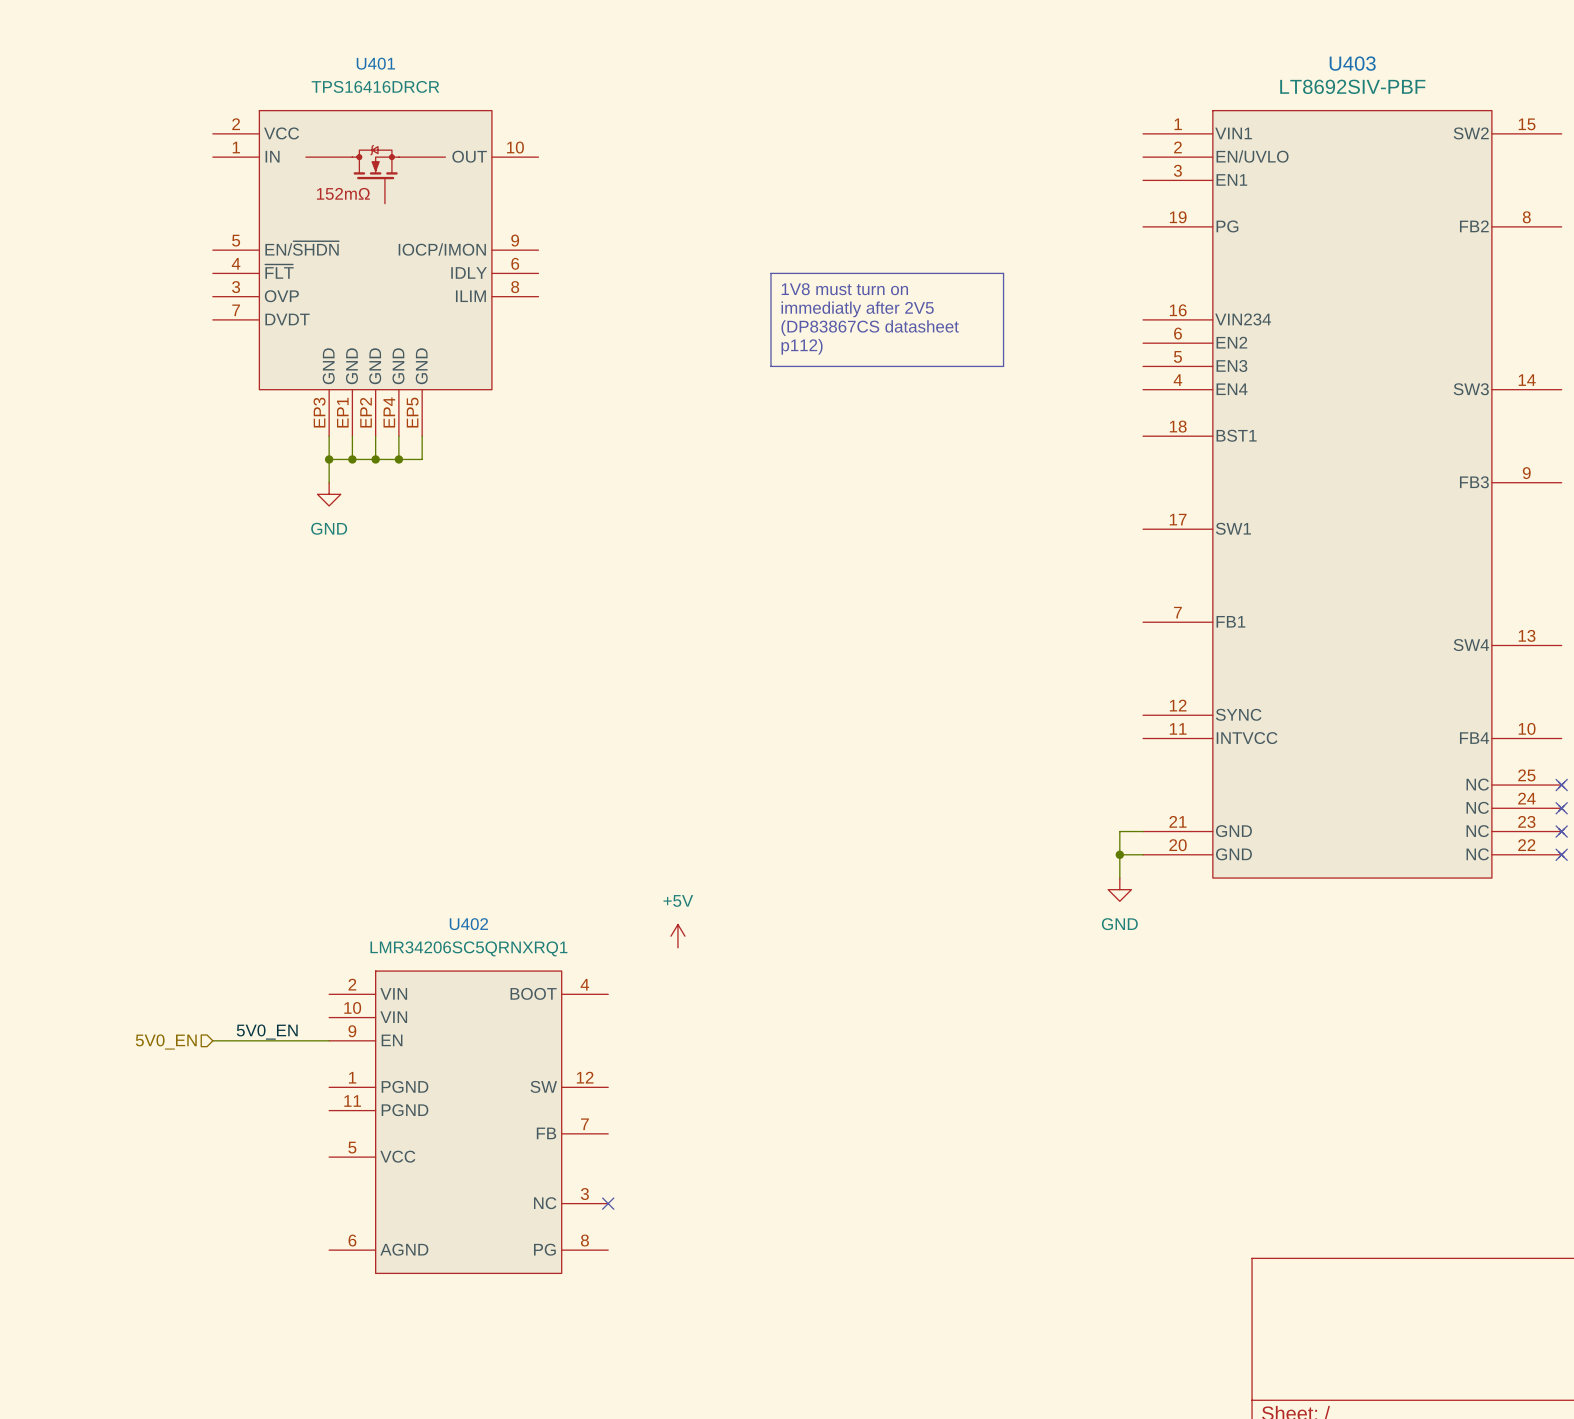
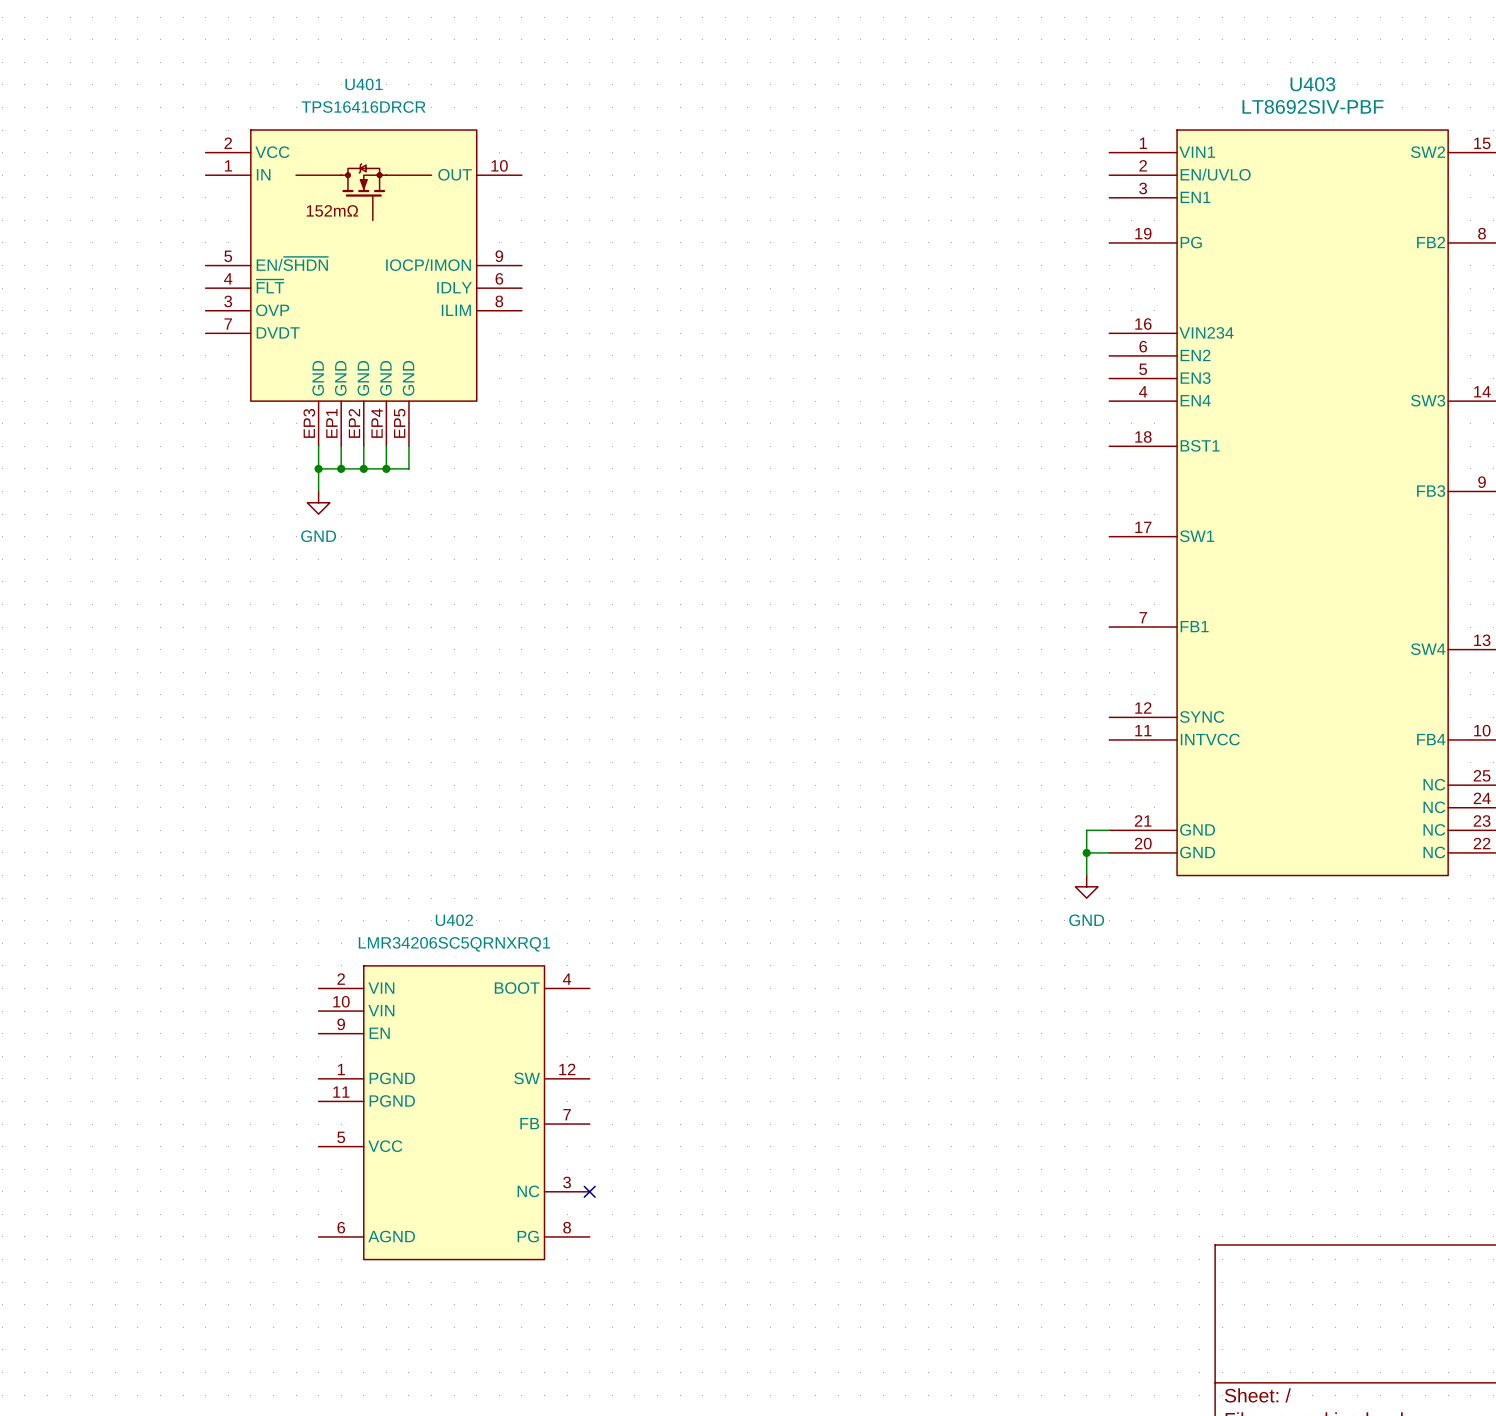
line: (770, 273) (1003, 273) (1003, 366) (770, 366) (770, 273) -> none
text: 1V8 must turn on (844, 289) -> none
text: immediatly after 2V5 (857, 309) -> none
text: (DP83867CS datasheet (870, 328) -> none
text: p112) (802, 346) -> none
power symbol: +5V (677, 936) -> none
label: 5V0_EN (267, 1032) -> none
wire: (212, 1040) (329, 1040) -> none
hierarchical label: 5V0_EN (166, 1041) -> none

